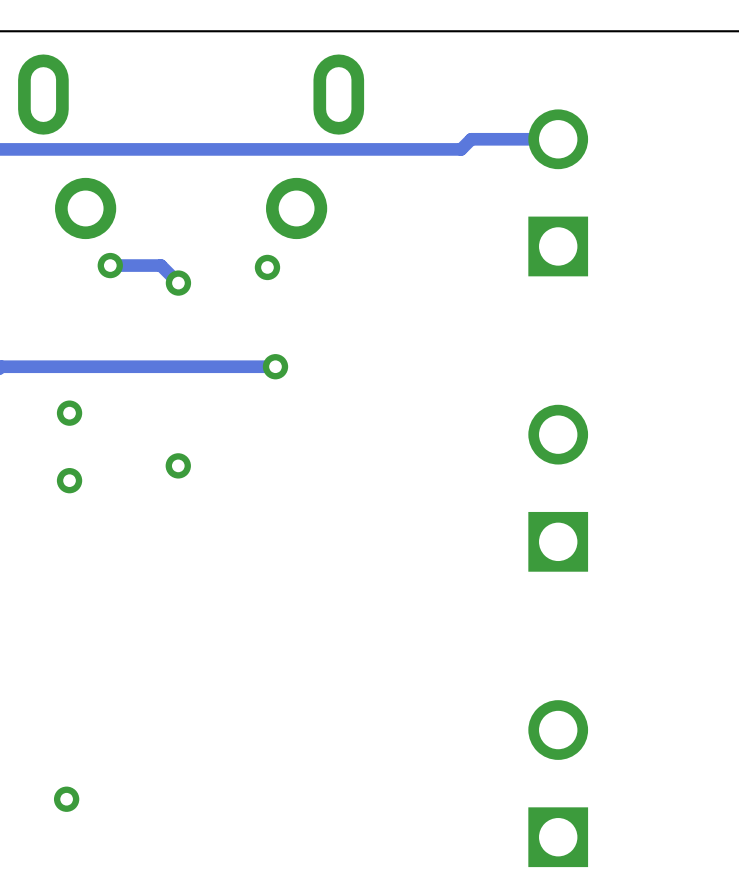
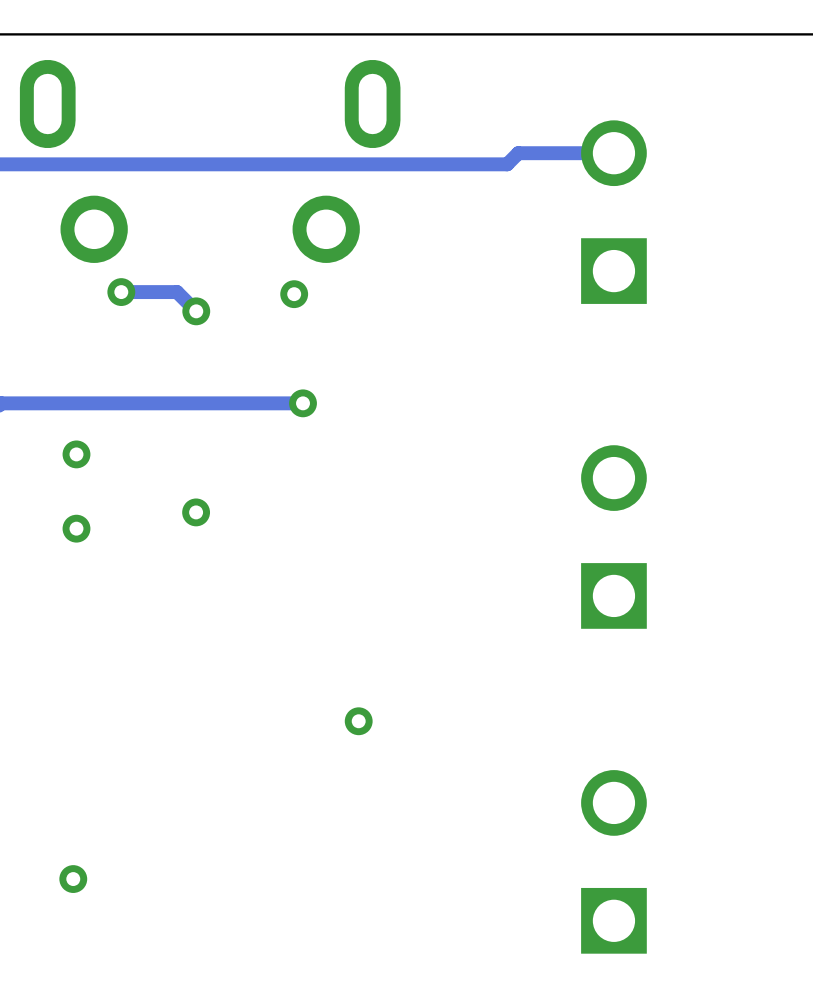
via: none -> (358, 721)

